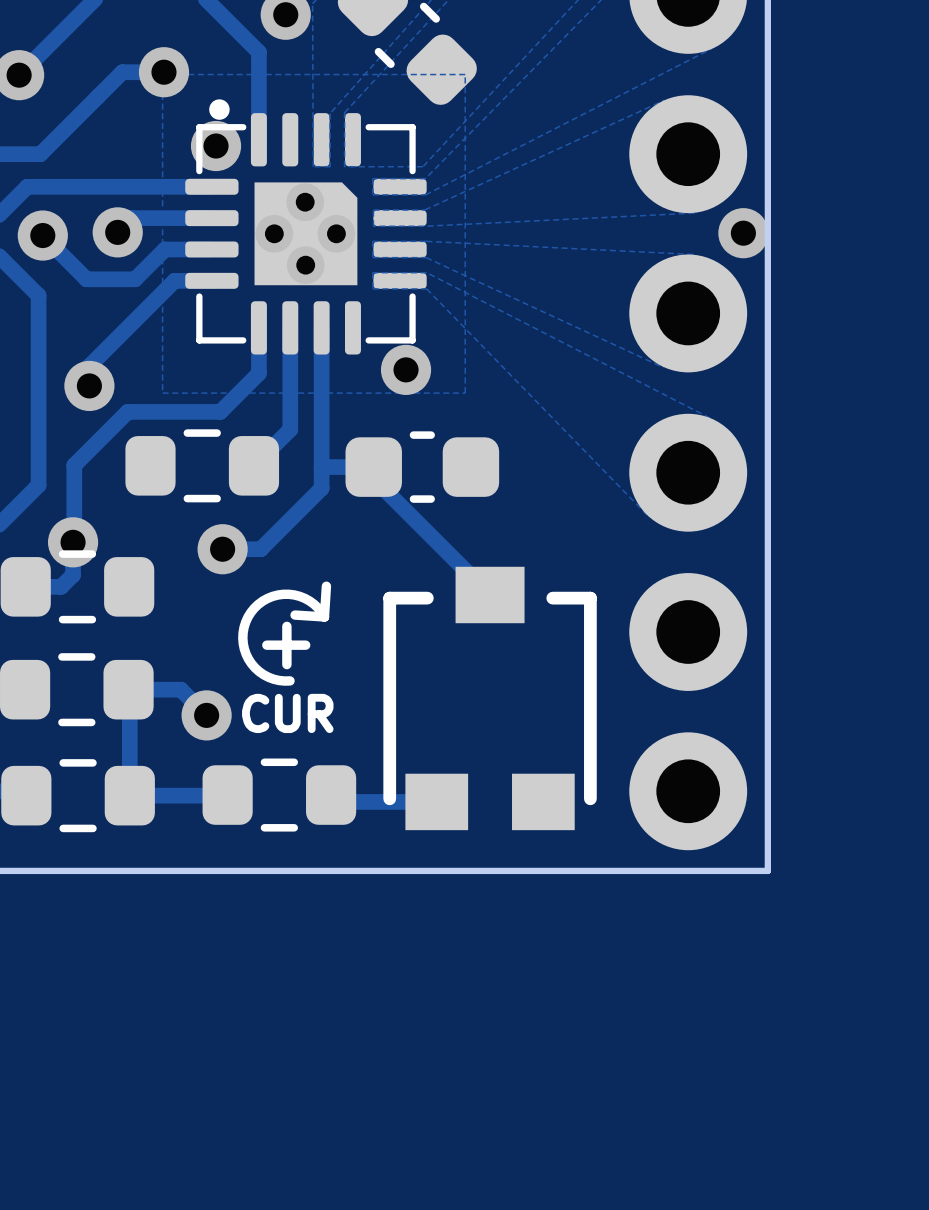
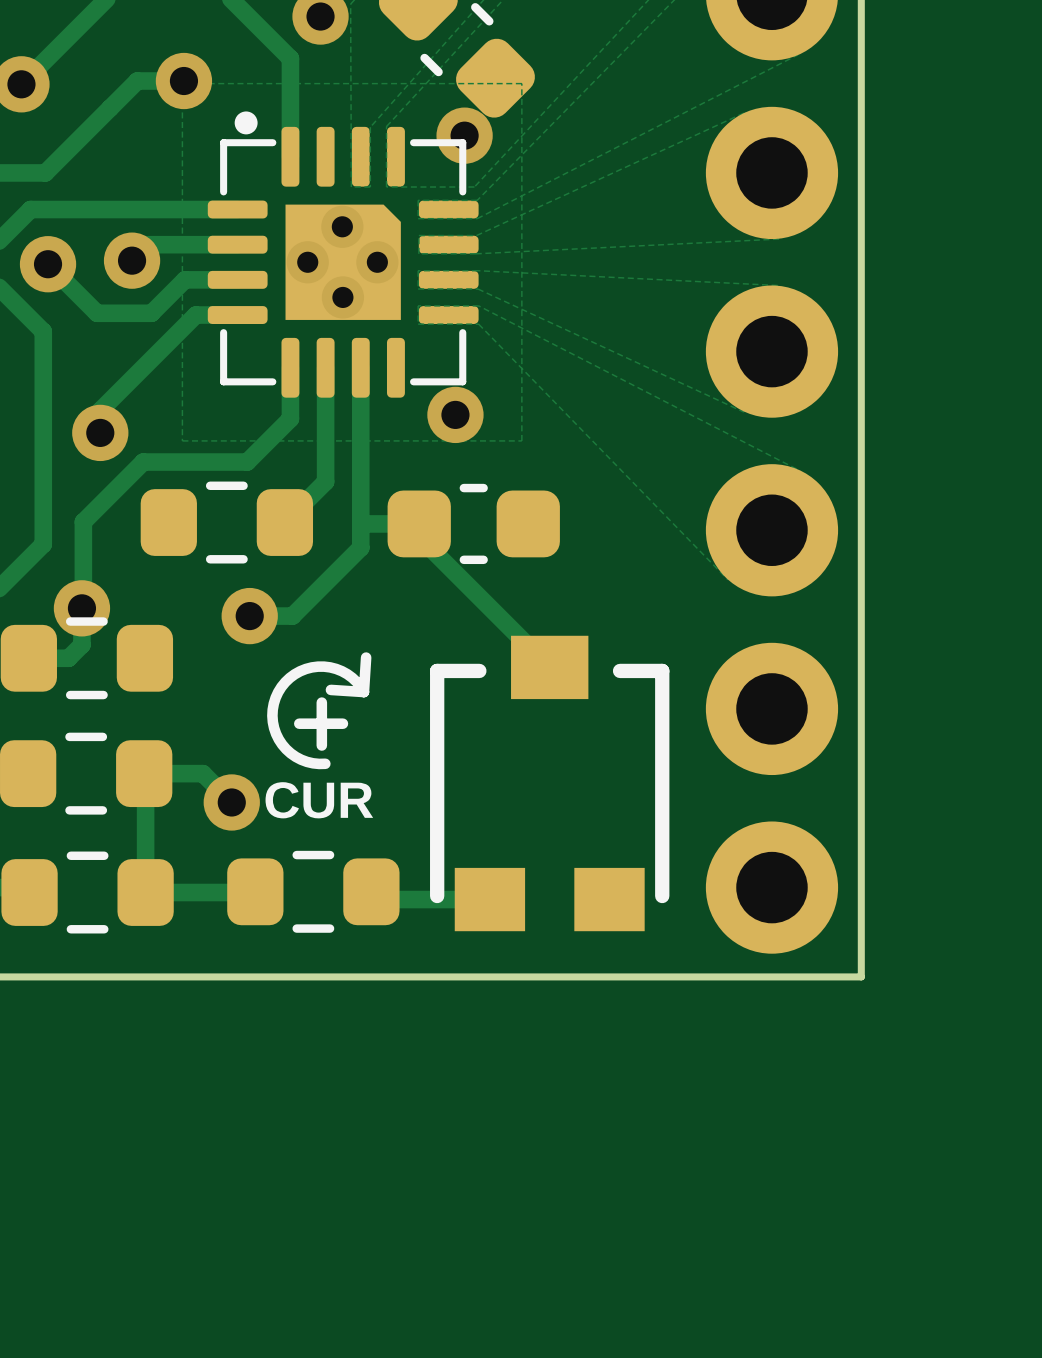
via: none -> (464, 135)
via: (216, 146) -> none
via: (743, 233) -> none

